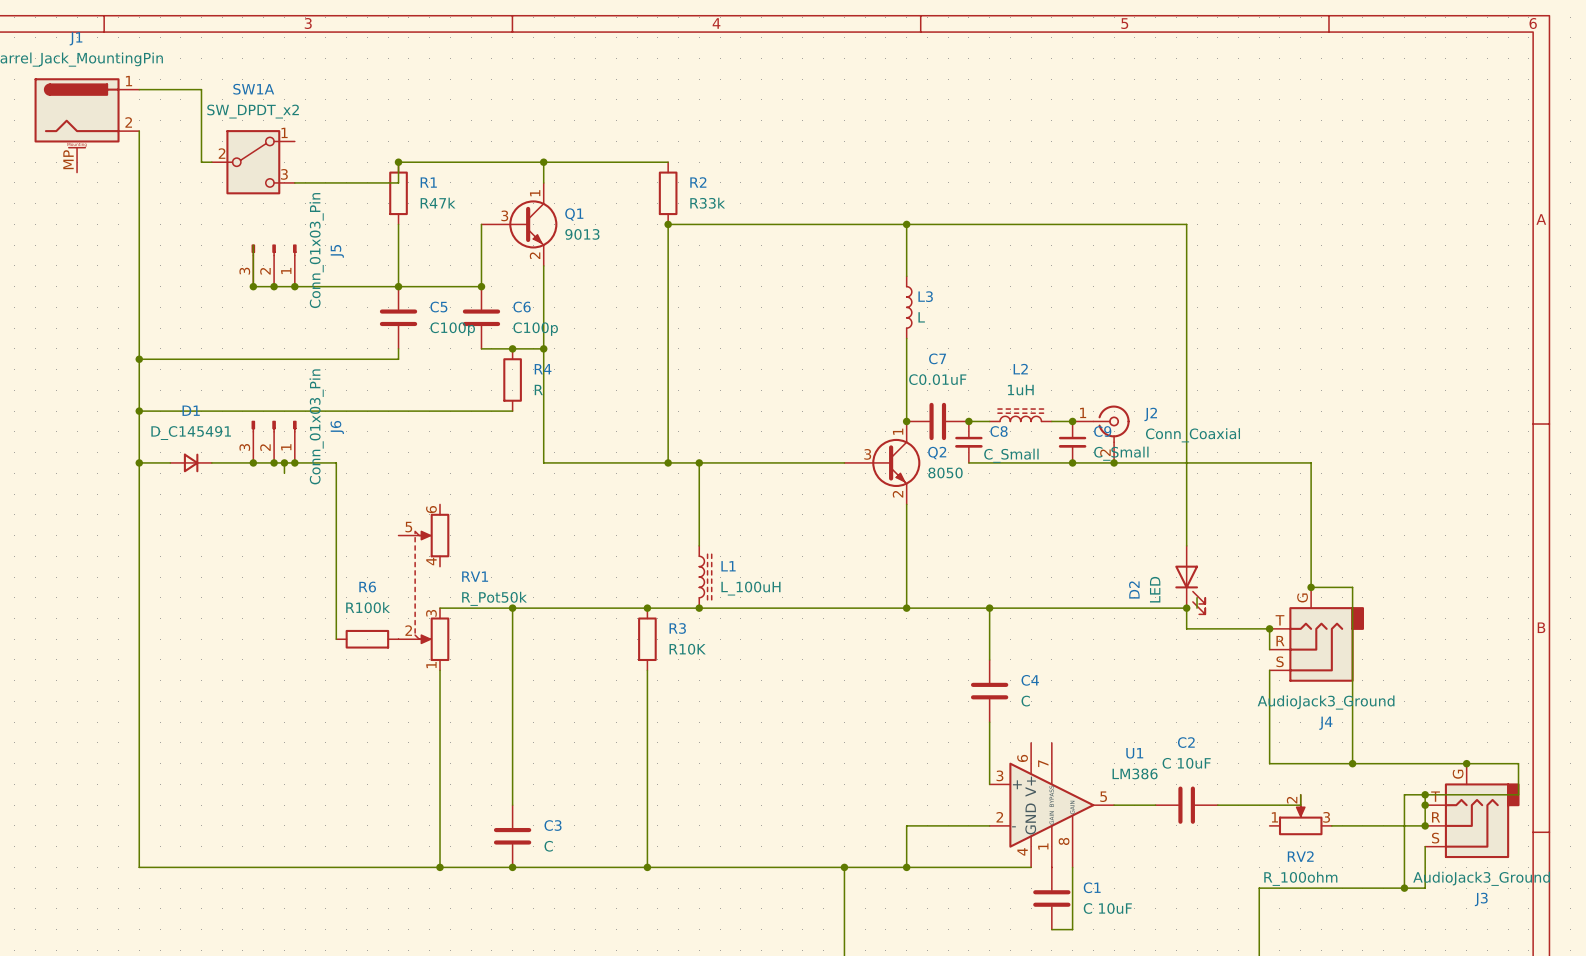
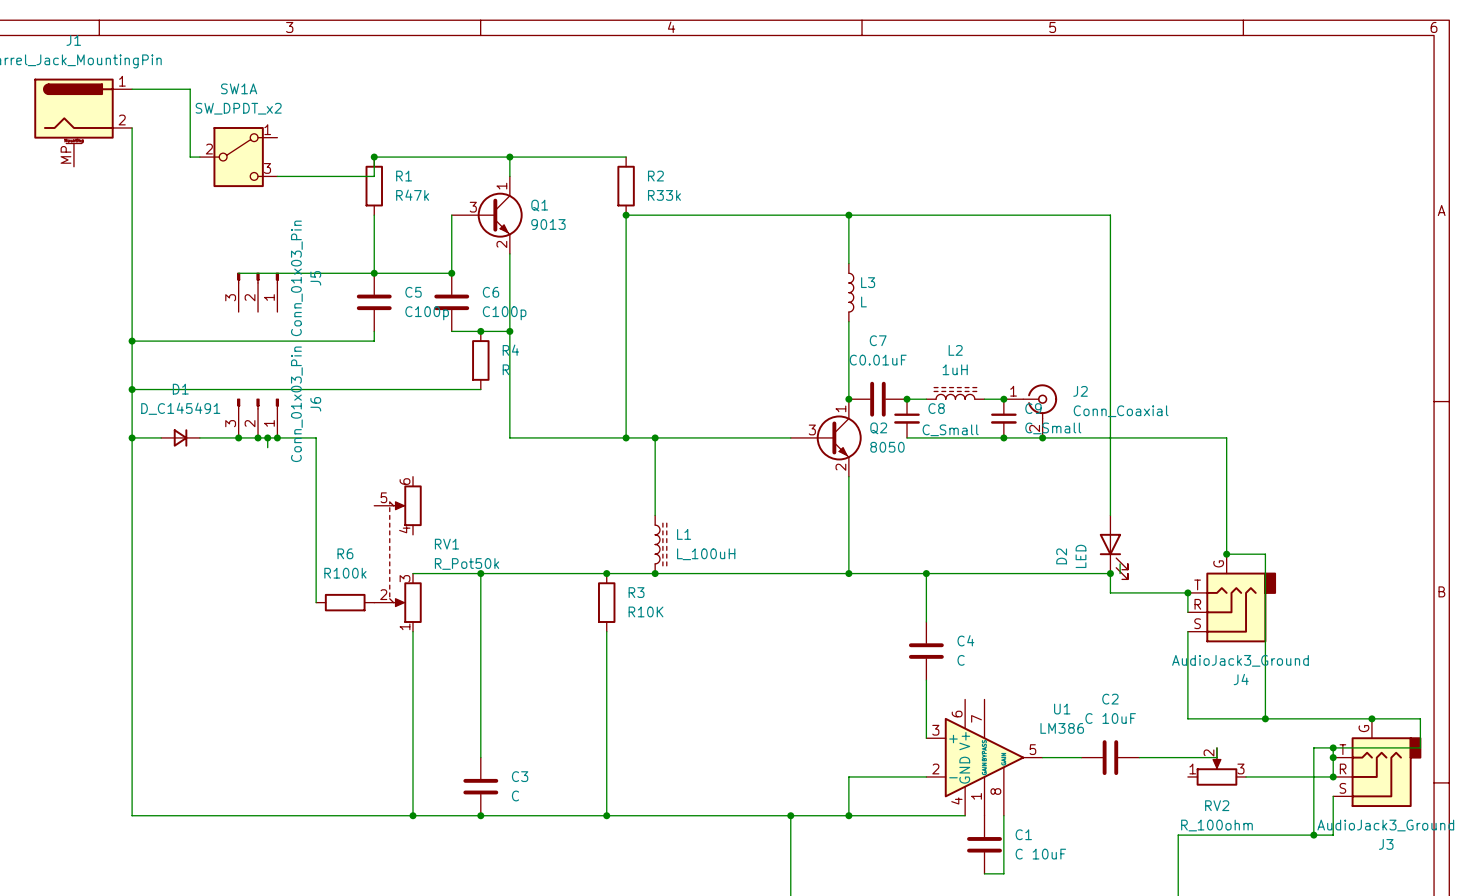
wire: (253, 245) (253, 286) -> none
J5 position: (274, 265) -> (258, 292)
junction: (253, 286) -> none
junction: (274, 286) -> none
junction: (294, 286) -> none

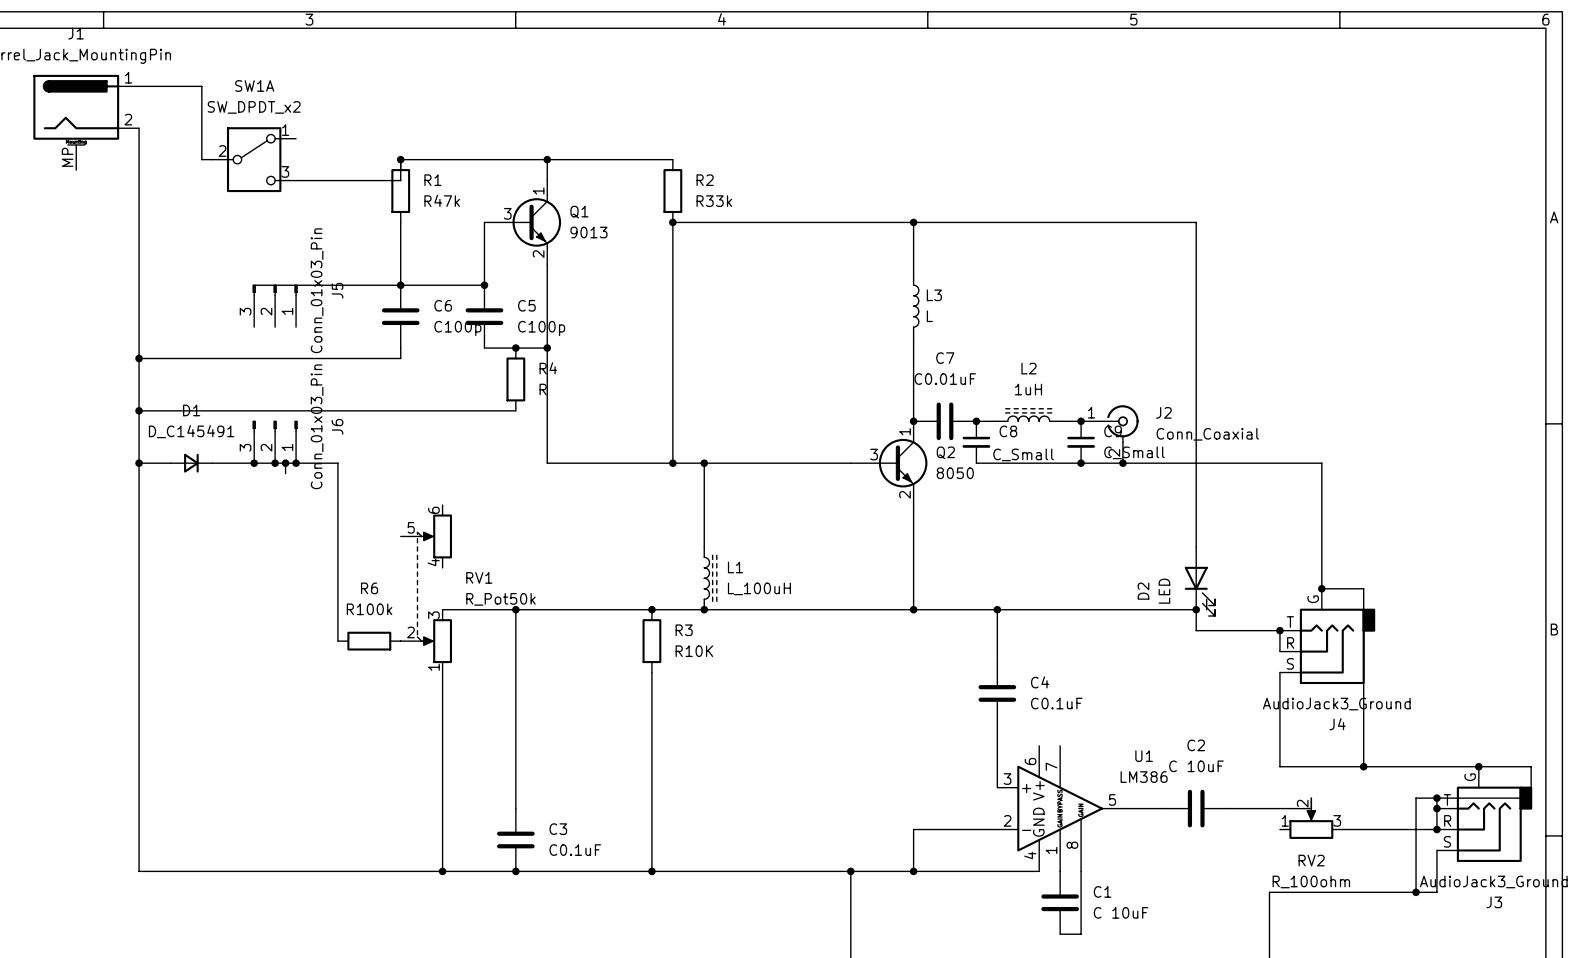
C5 name: C5 (413, 292) -> C6 (443, 305)
C6 name: C6 (491, 292) -> C5 (526, 305)
C4 value: C (961, 660) -> C0.1uF (1056, 703)
C3 value: C (515, 795) -> C0.1uF (575, 850)

